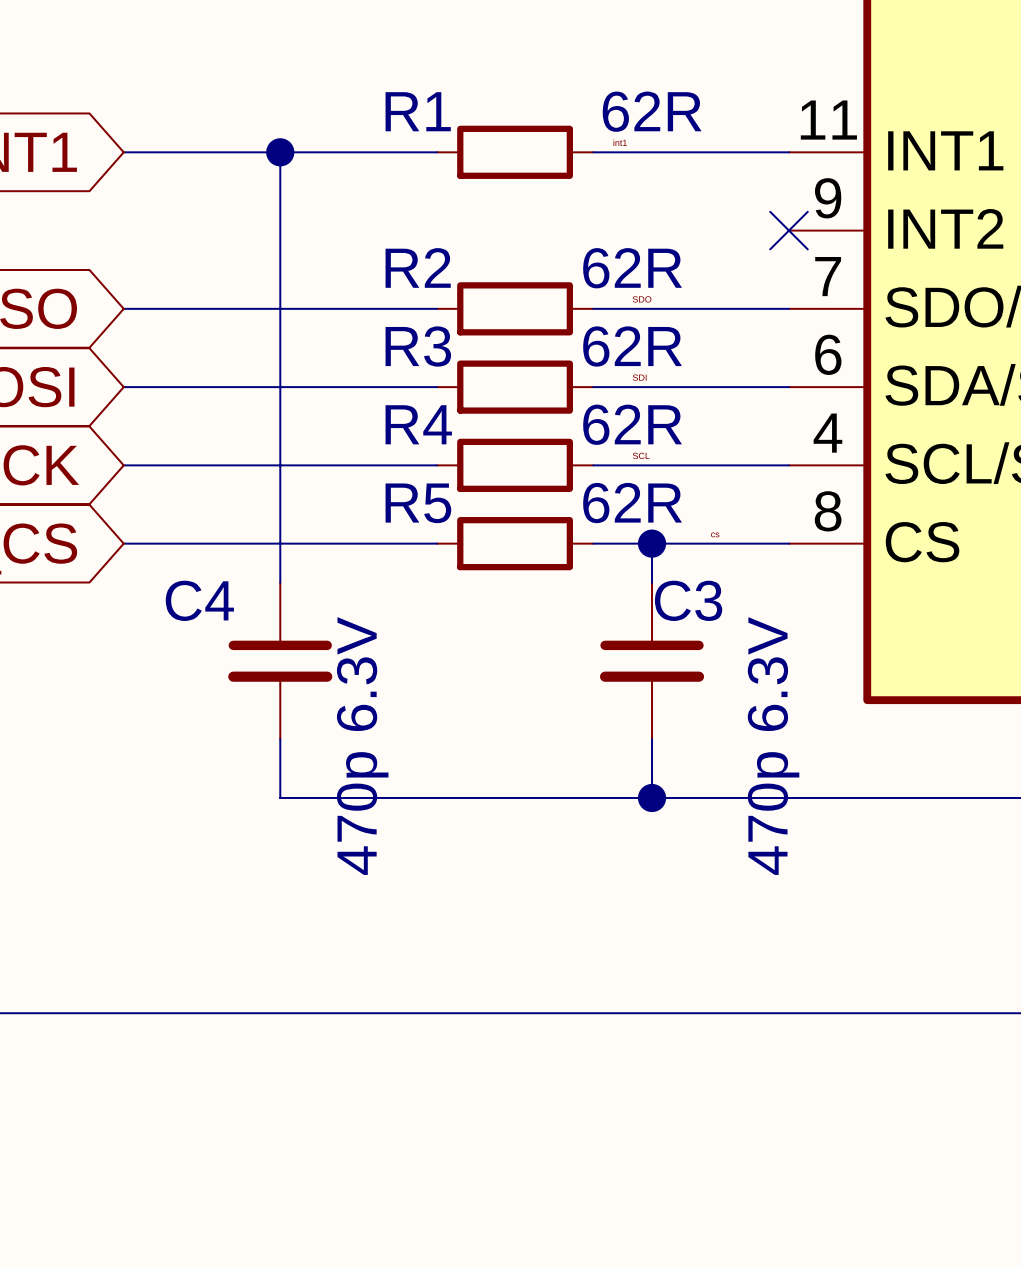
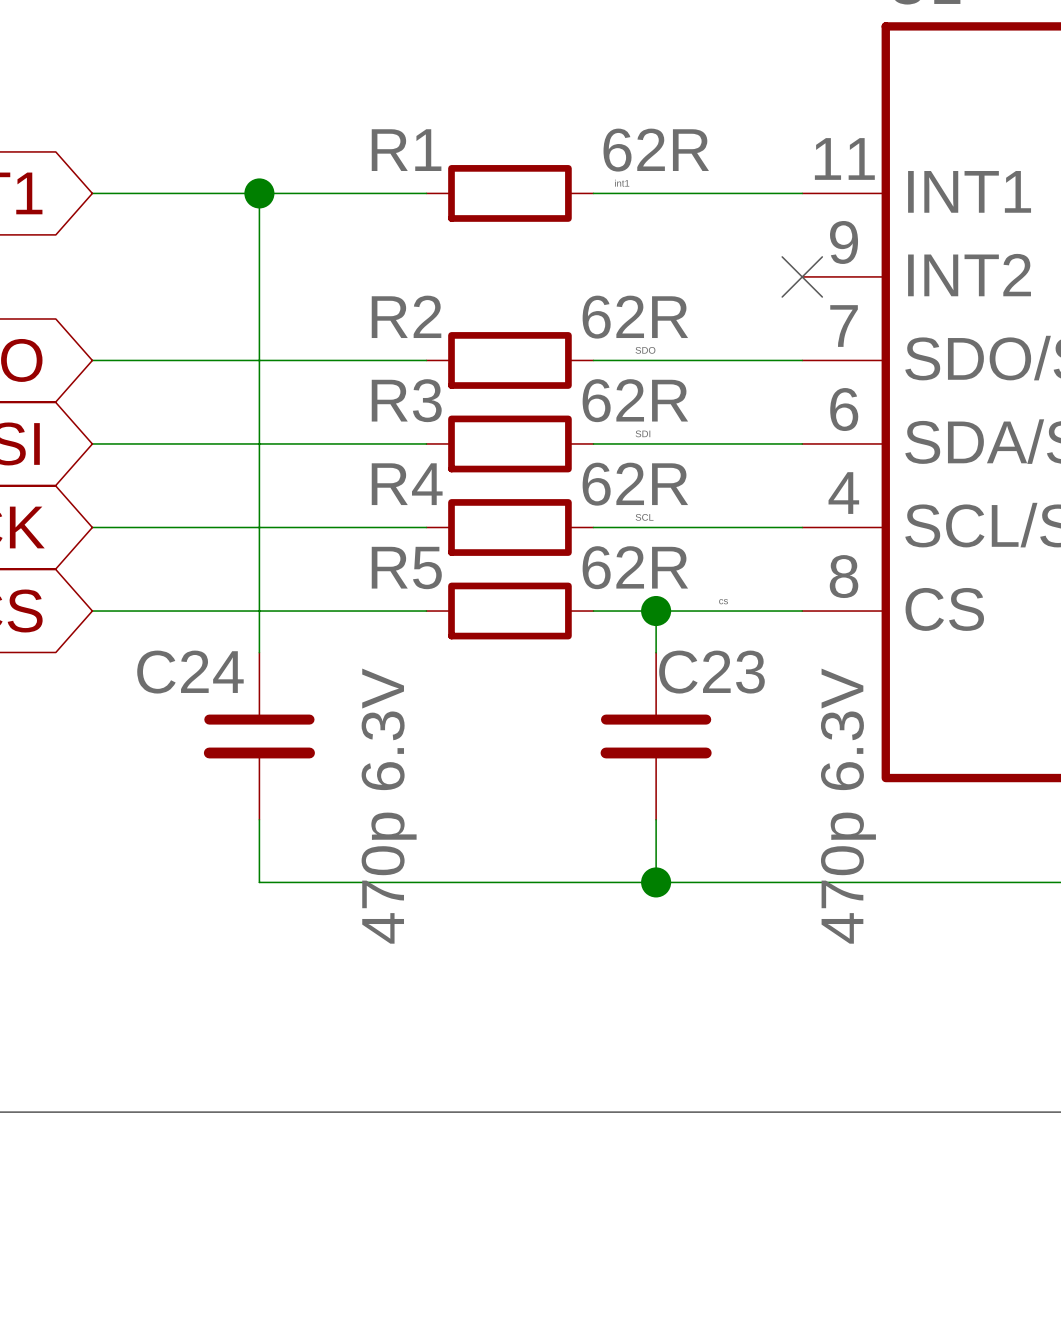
C4 name: C4 (199, 600) -> C24 (190, 672)
C3 name: C3 (688, 600) -> C23 (711, 672)
C4 value position: 470p 6.3V (362, 746) -> 470p 6.3V (389, 806)
C3 value position: 470p 6.3V (773, 746) -> 470p 6.3V (848, 806)

